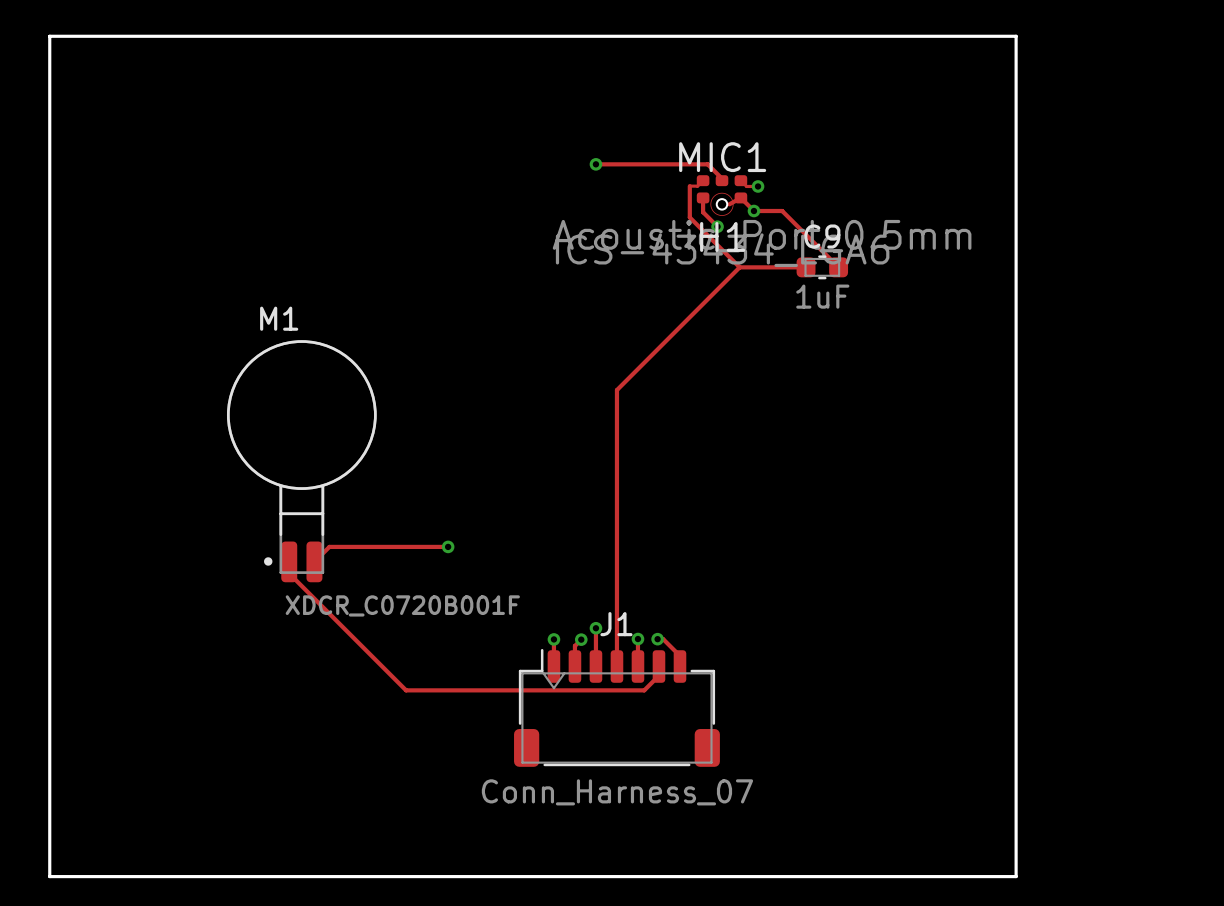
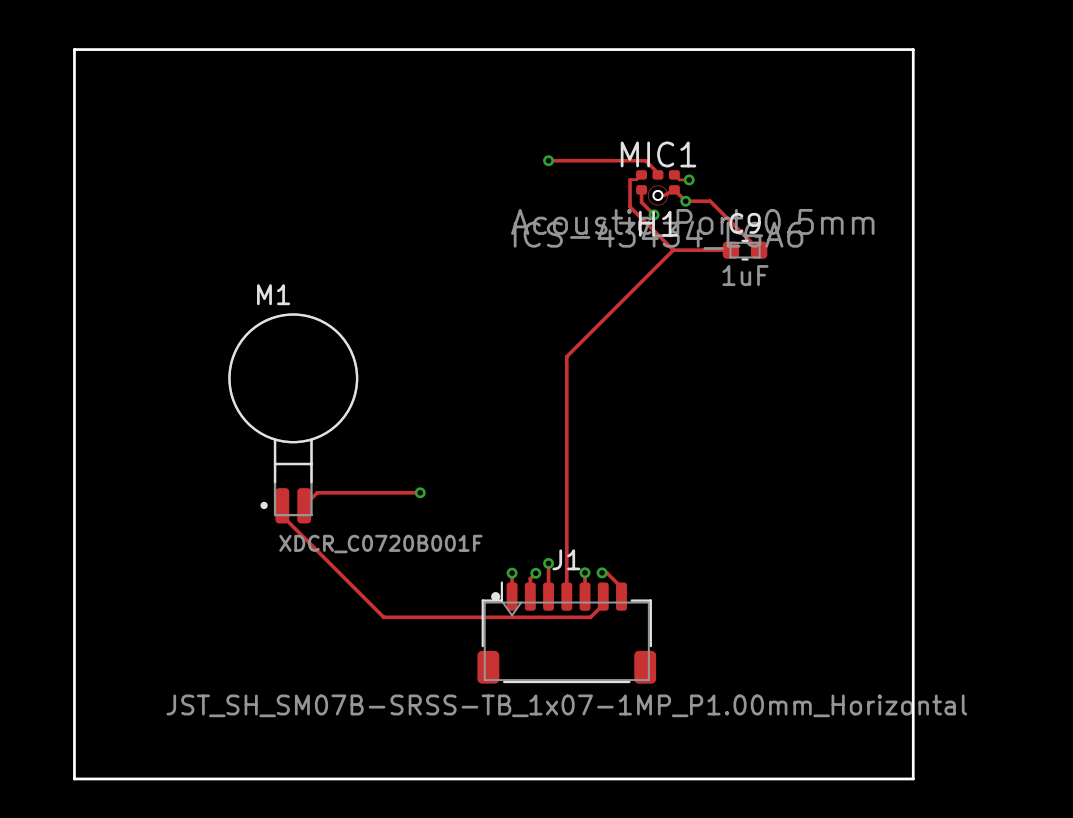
J1 footprint: [514, 648, 720, 767] -> [477, 581, 657, 684]
J1 value: Conn_Harness_07 (617, 792) -> JST_SH_SM07B-SRSS-TB_1x07-1MP_P1.00mm_Horizontal (566, 705)

